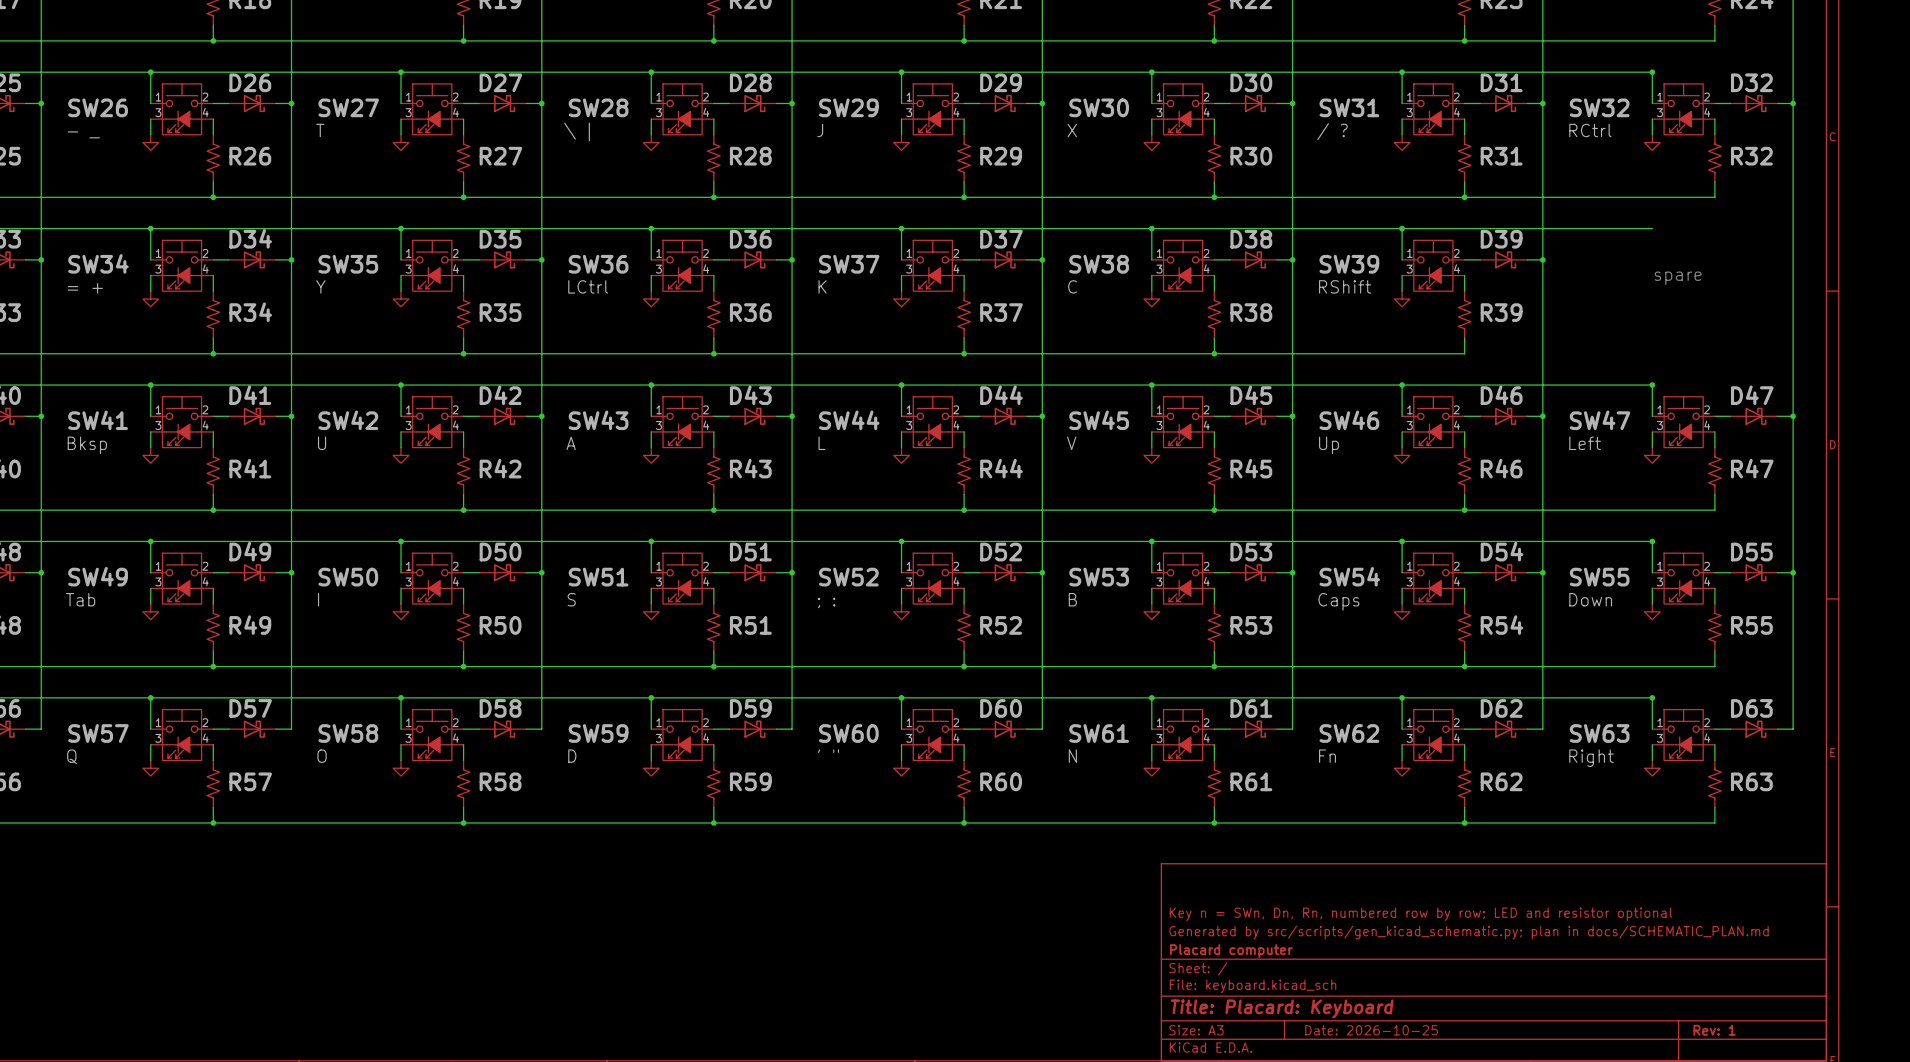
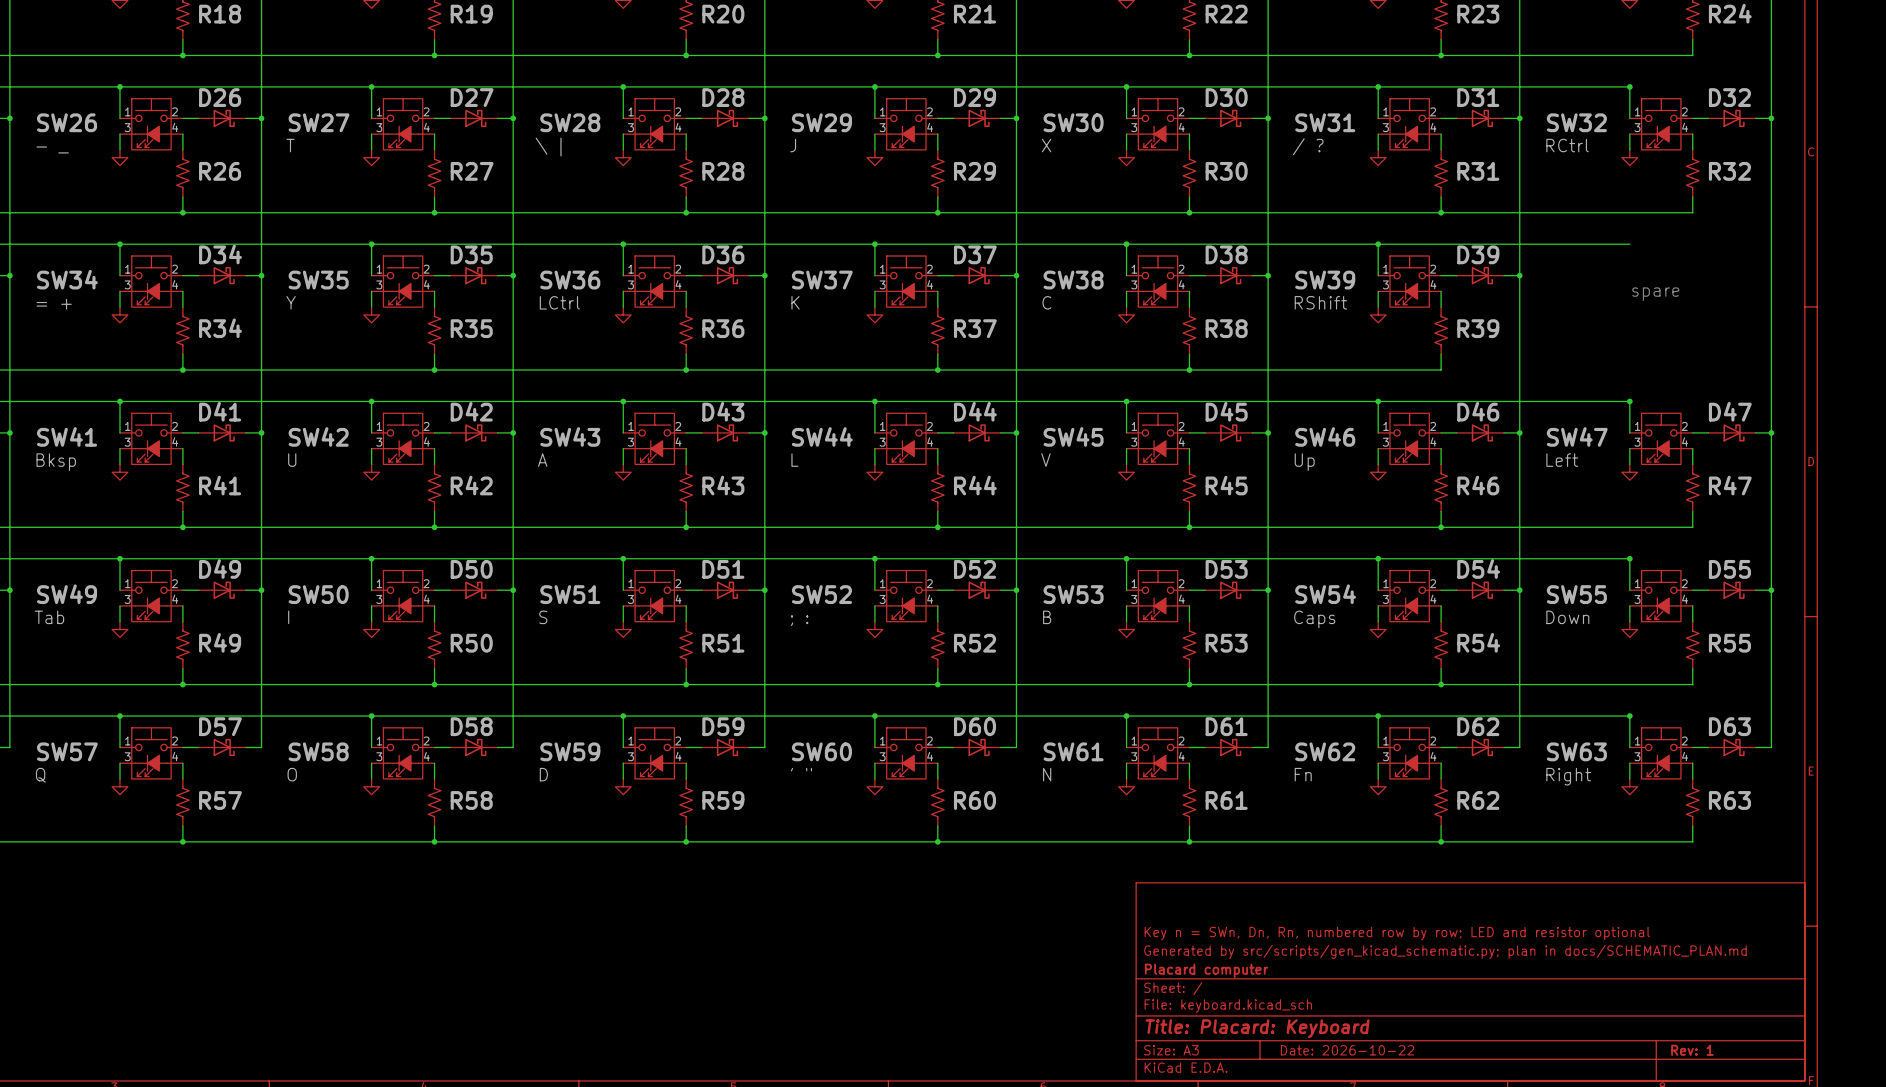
title block: Date: 2026-10-25 (1371, 1030) -> Date: 2026-10-22 (1347, 1050)

